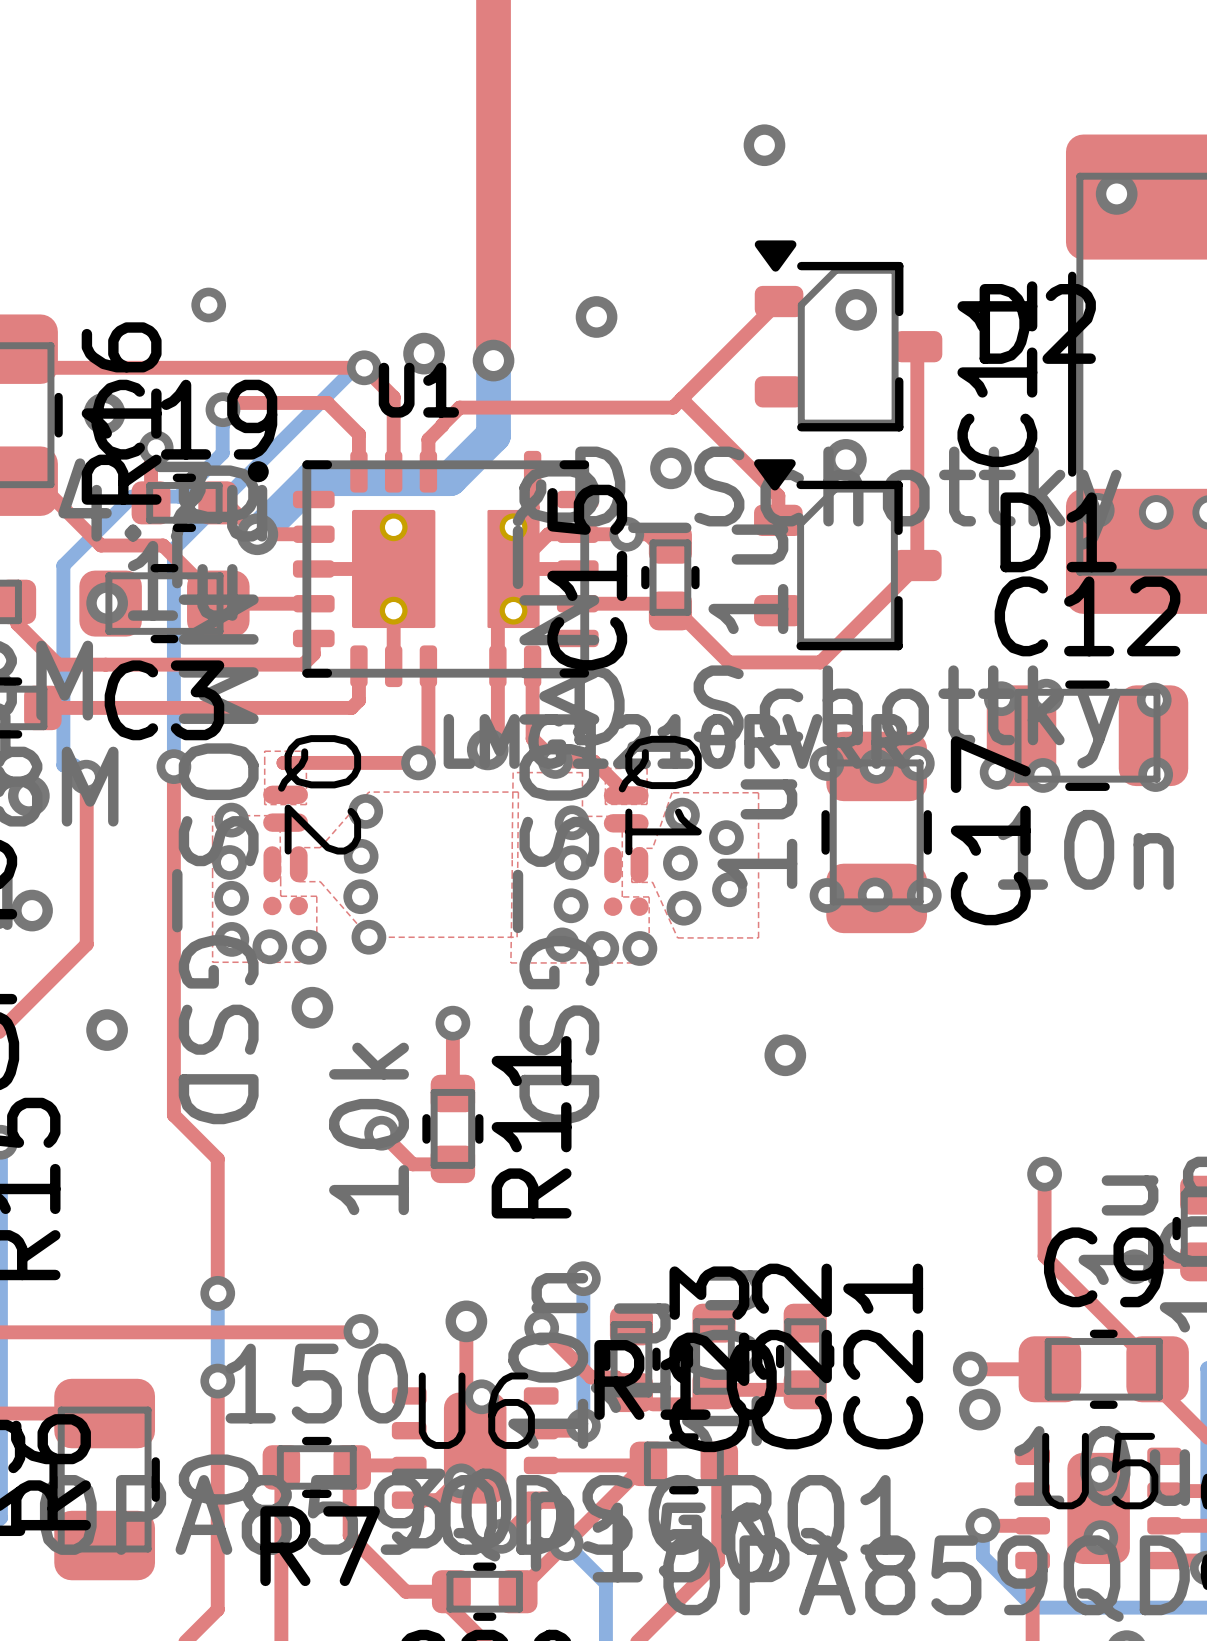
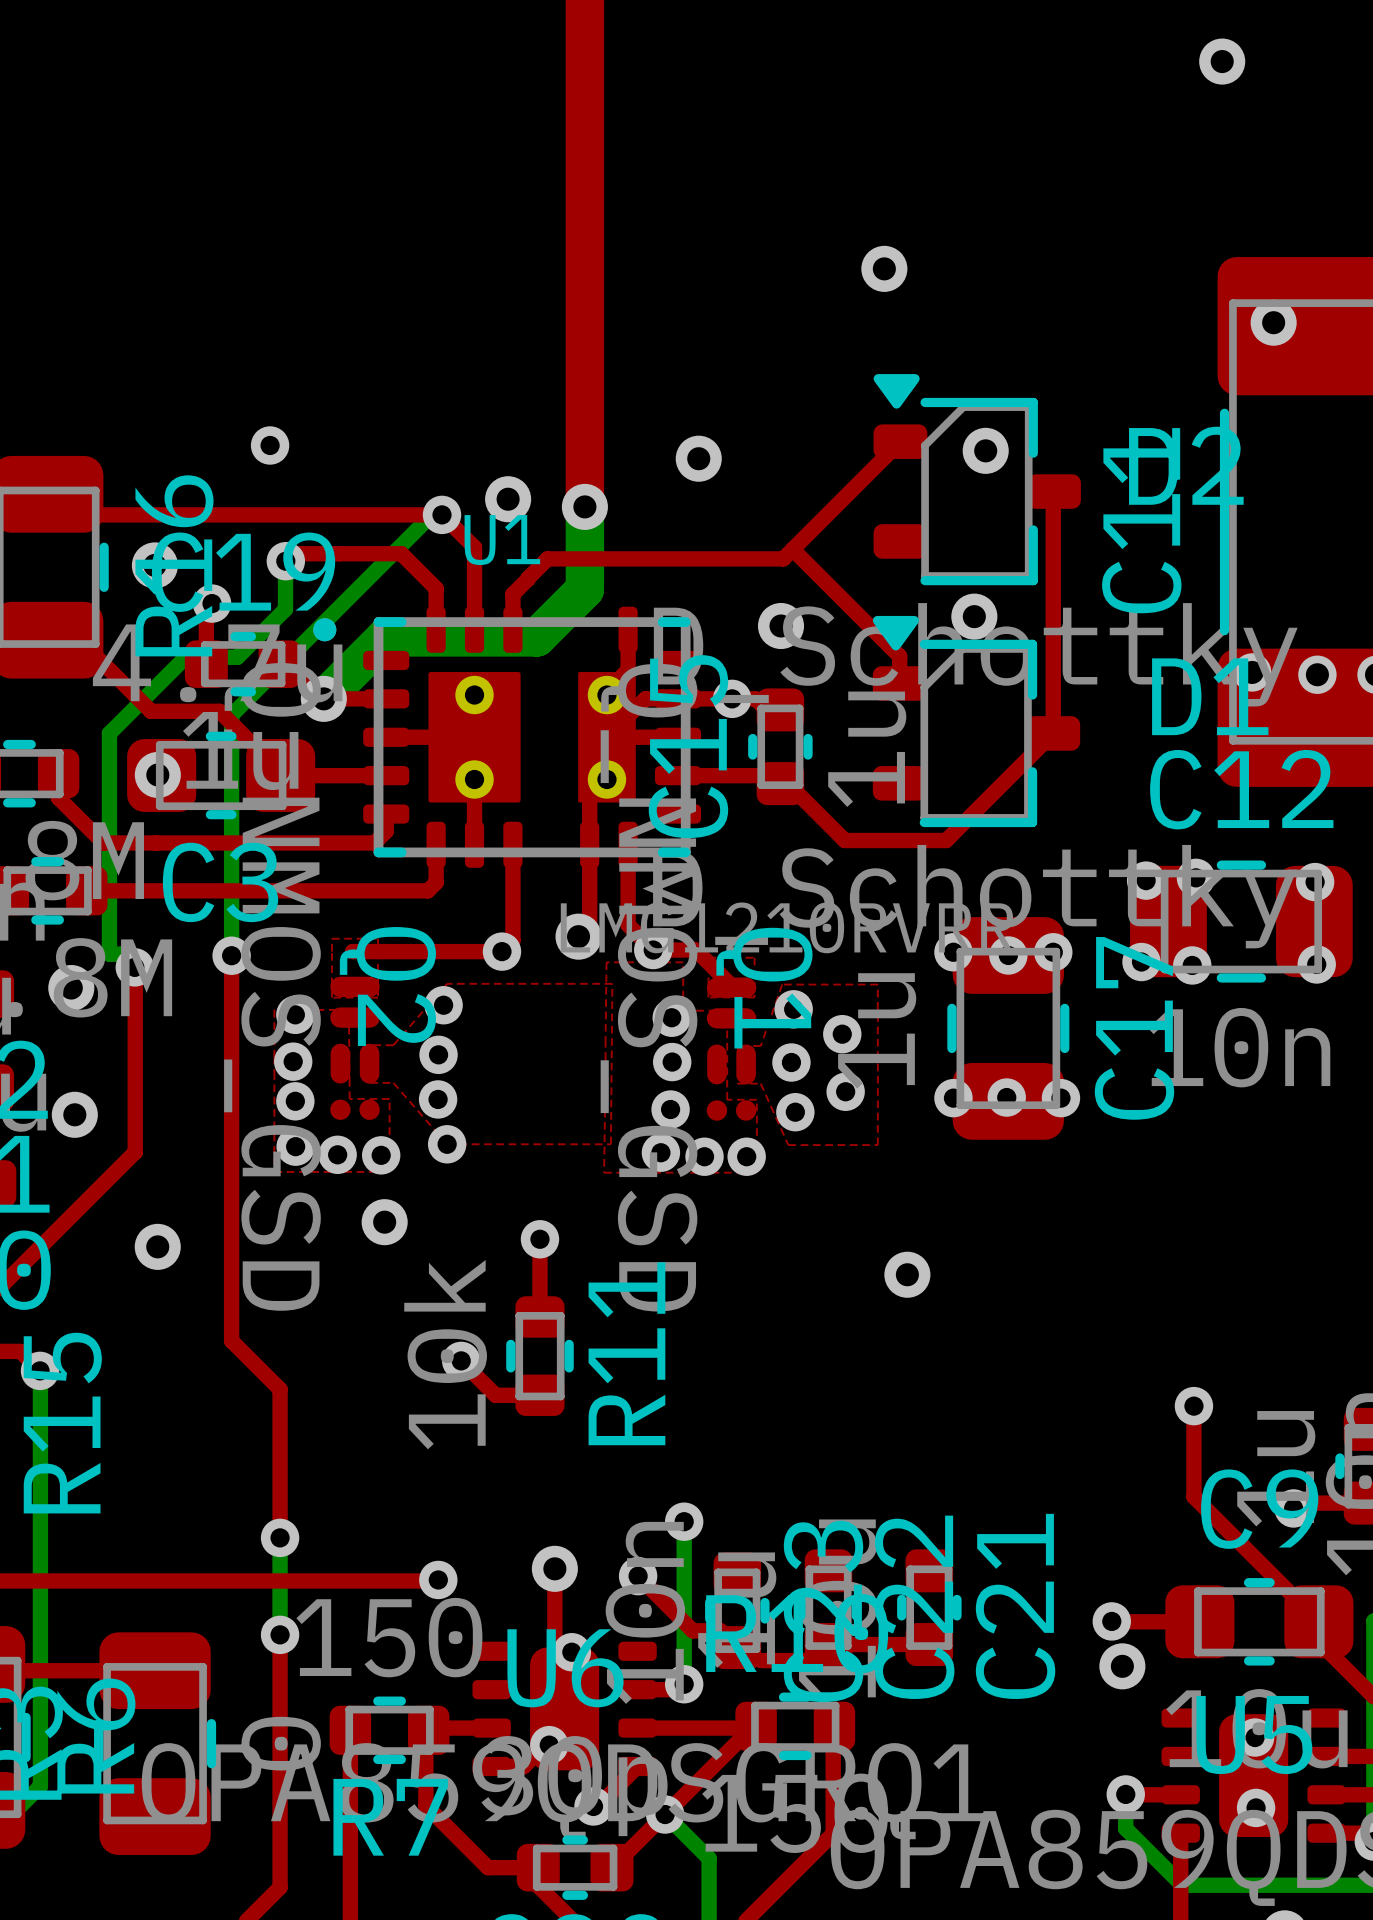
U1 footprint: [247, 450, 599, 688] -> [313, 606, 702, 868]

